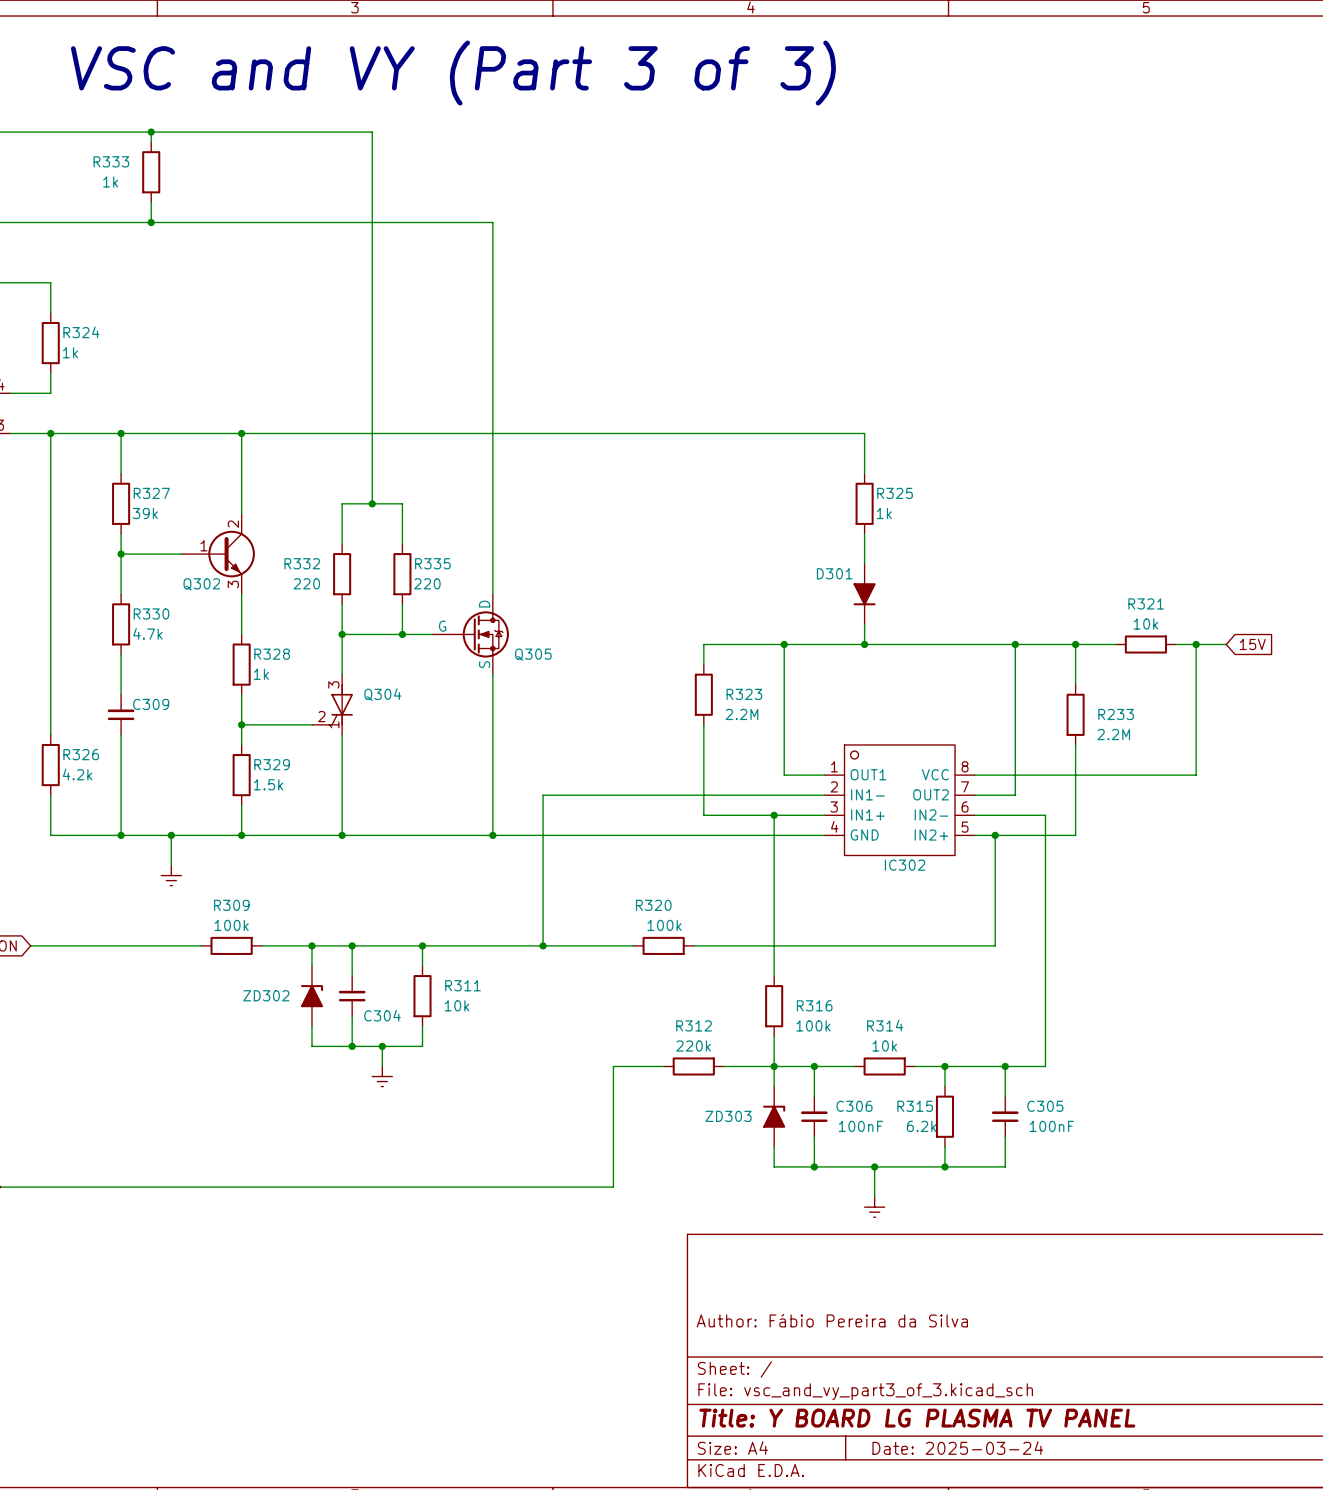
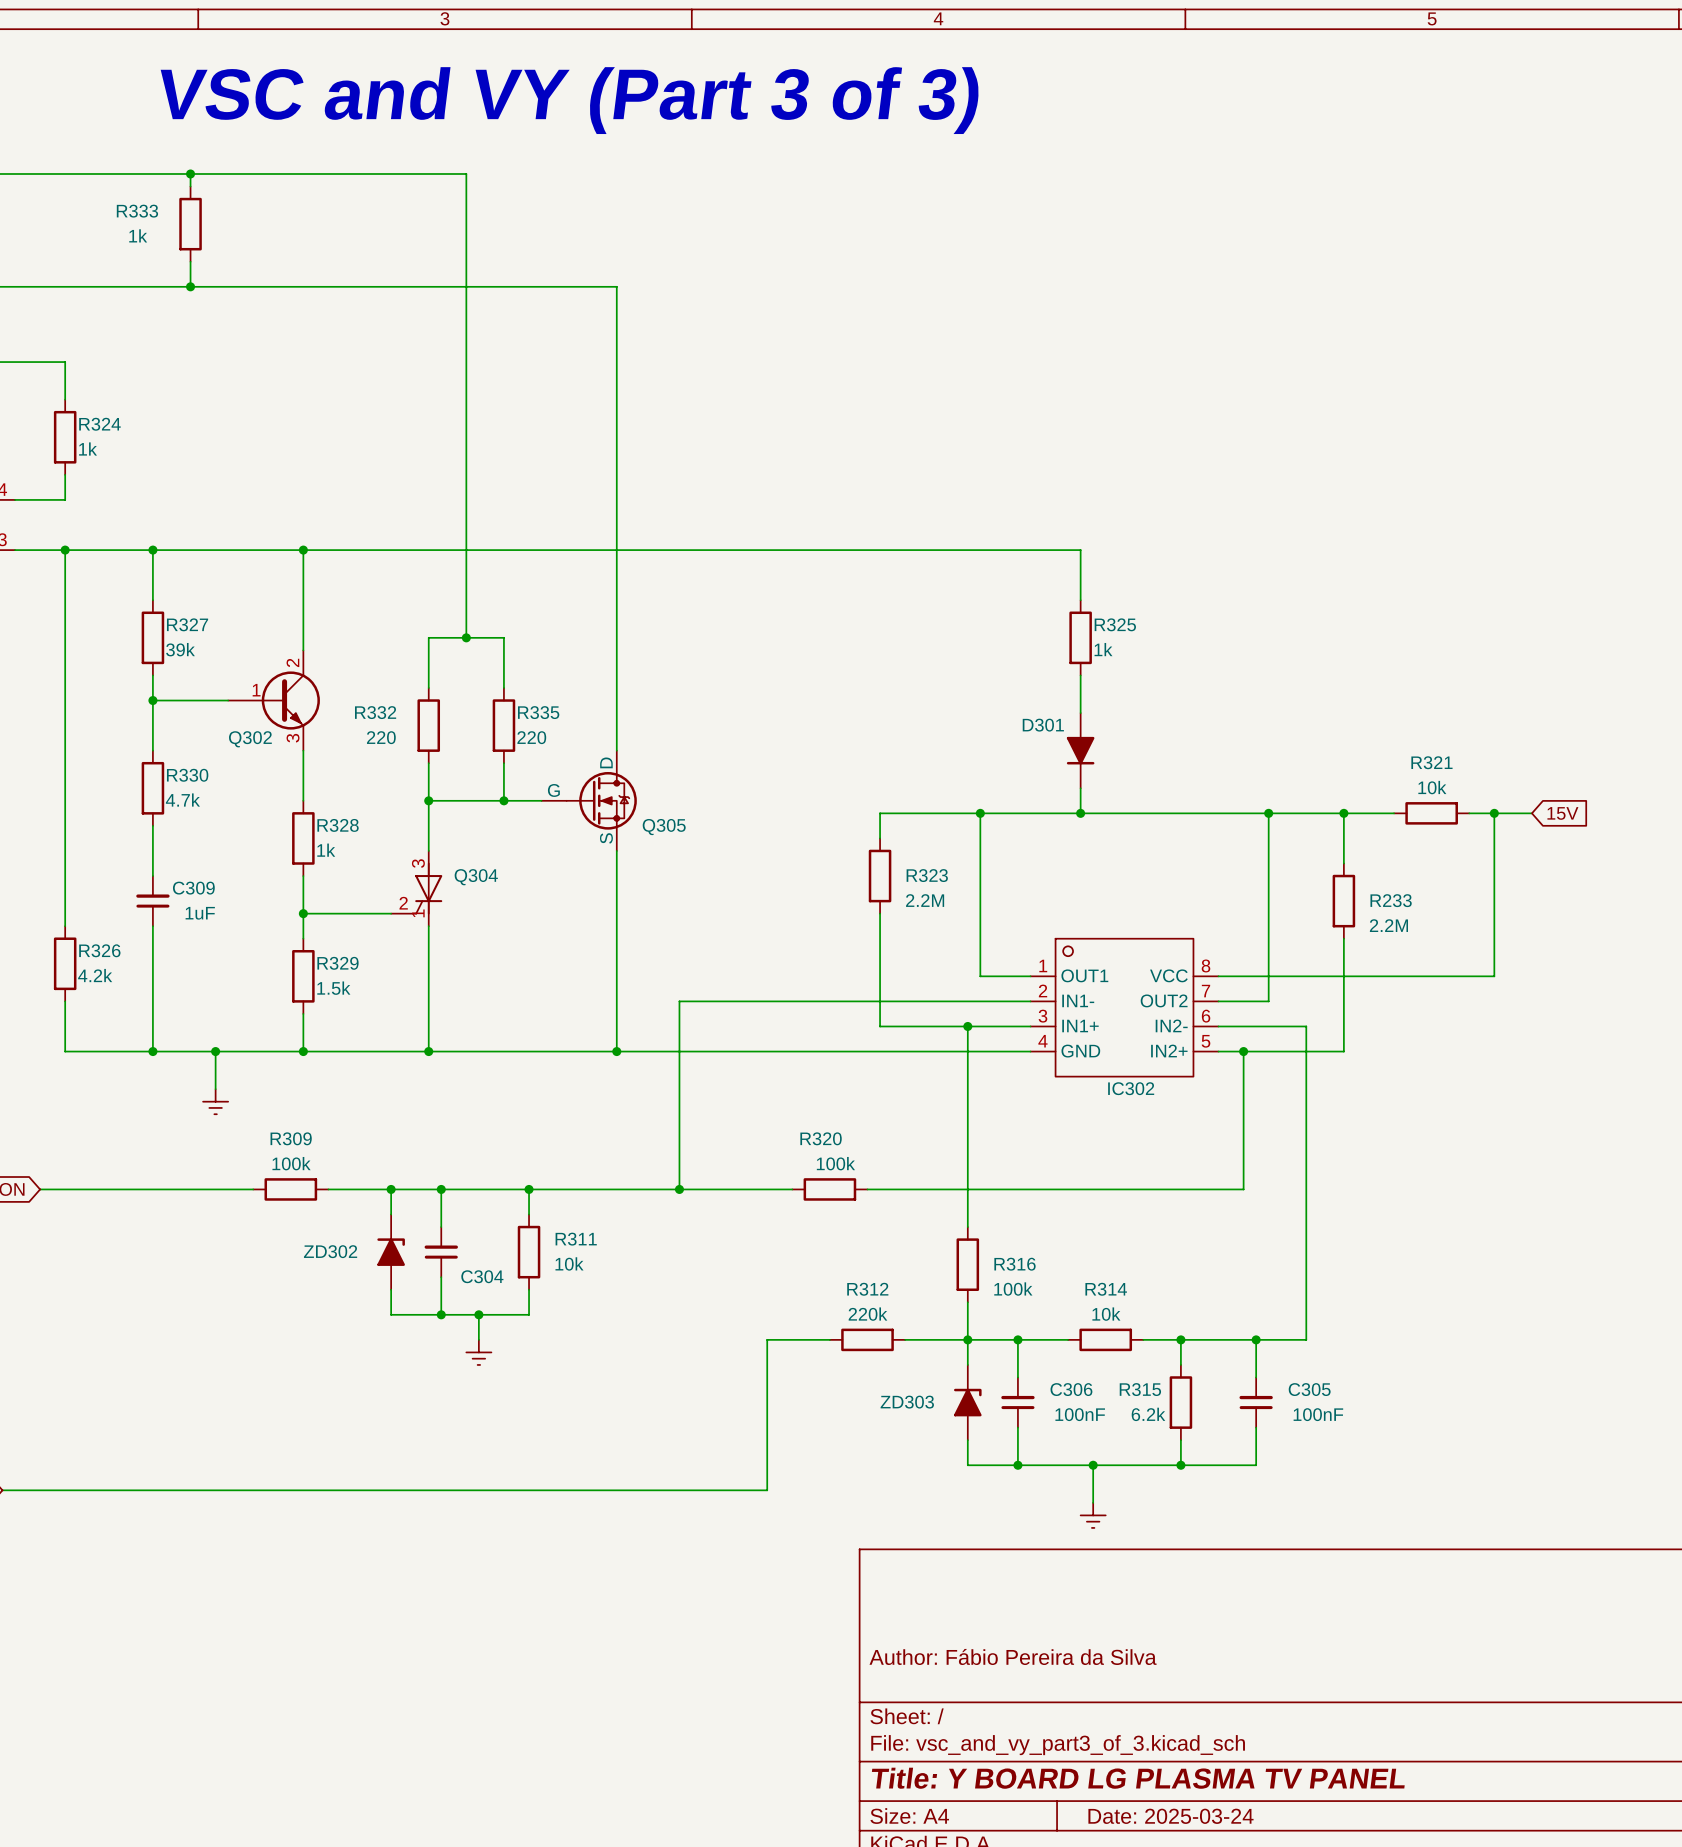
C309 value: none -> 1uF (200, 913)

